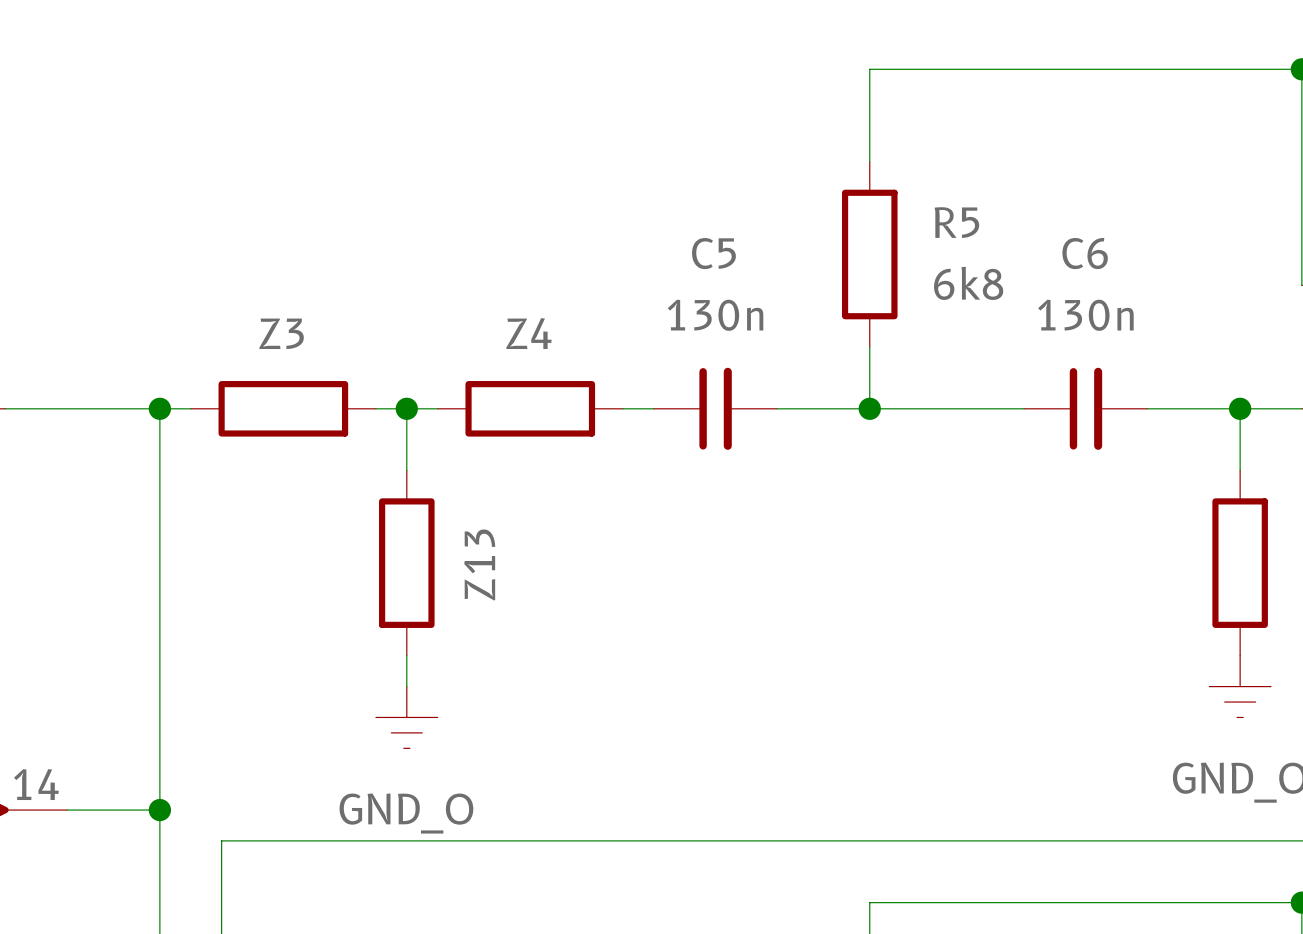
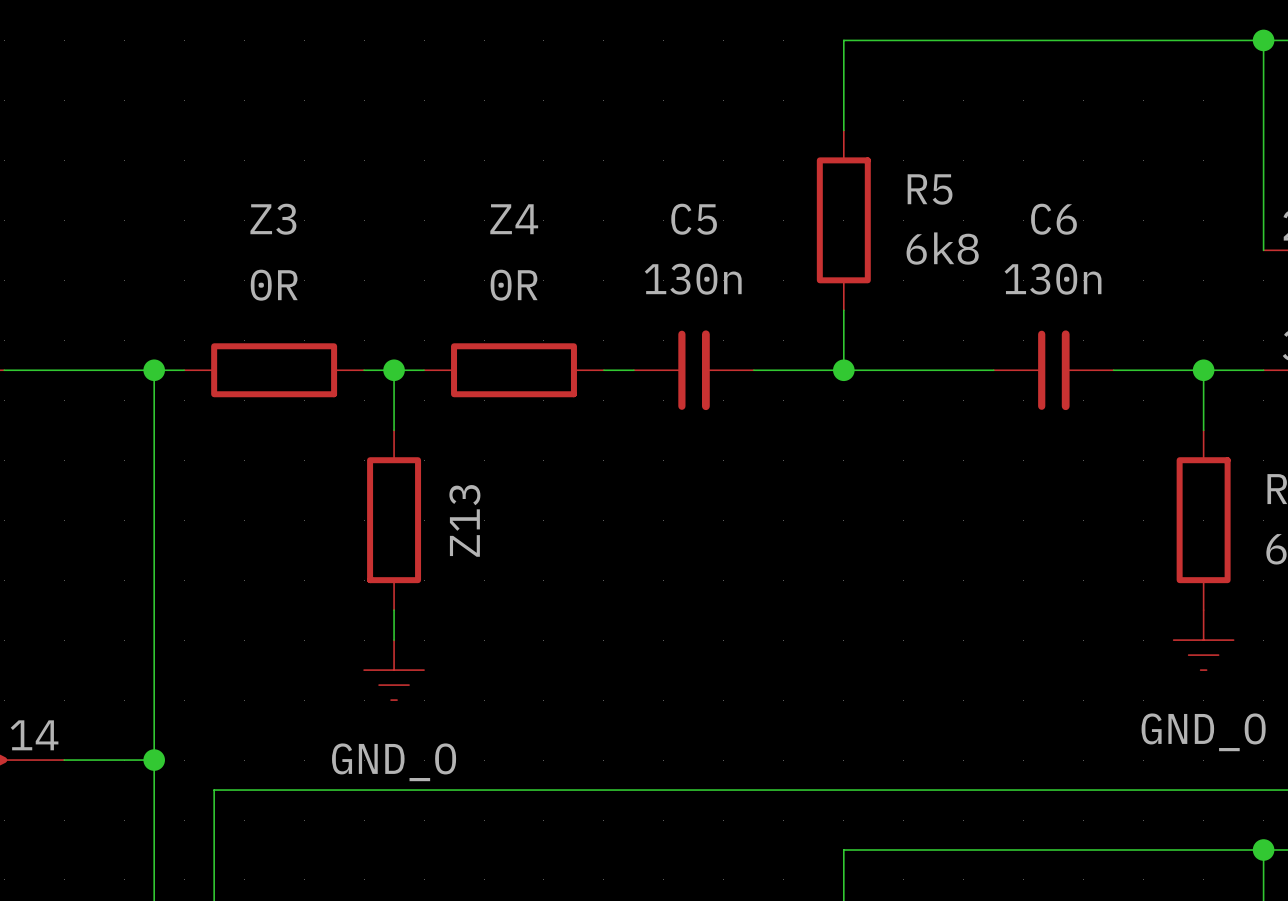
Z3 value: none -> 0R (274, 285)
Z4 value: none -> 0R (514, 285)
Z3 name position: Z3 (281, 333) -> Z3 (273, 219)
Z4 name position: Z4 (528, 333) -> Z4 (514, 219)

